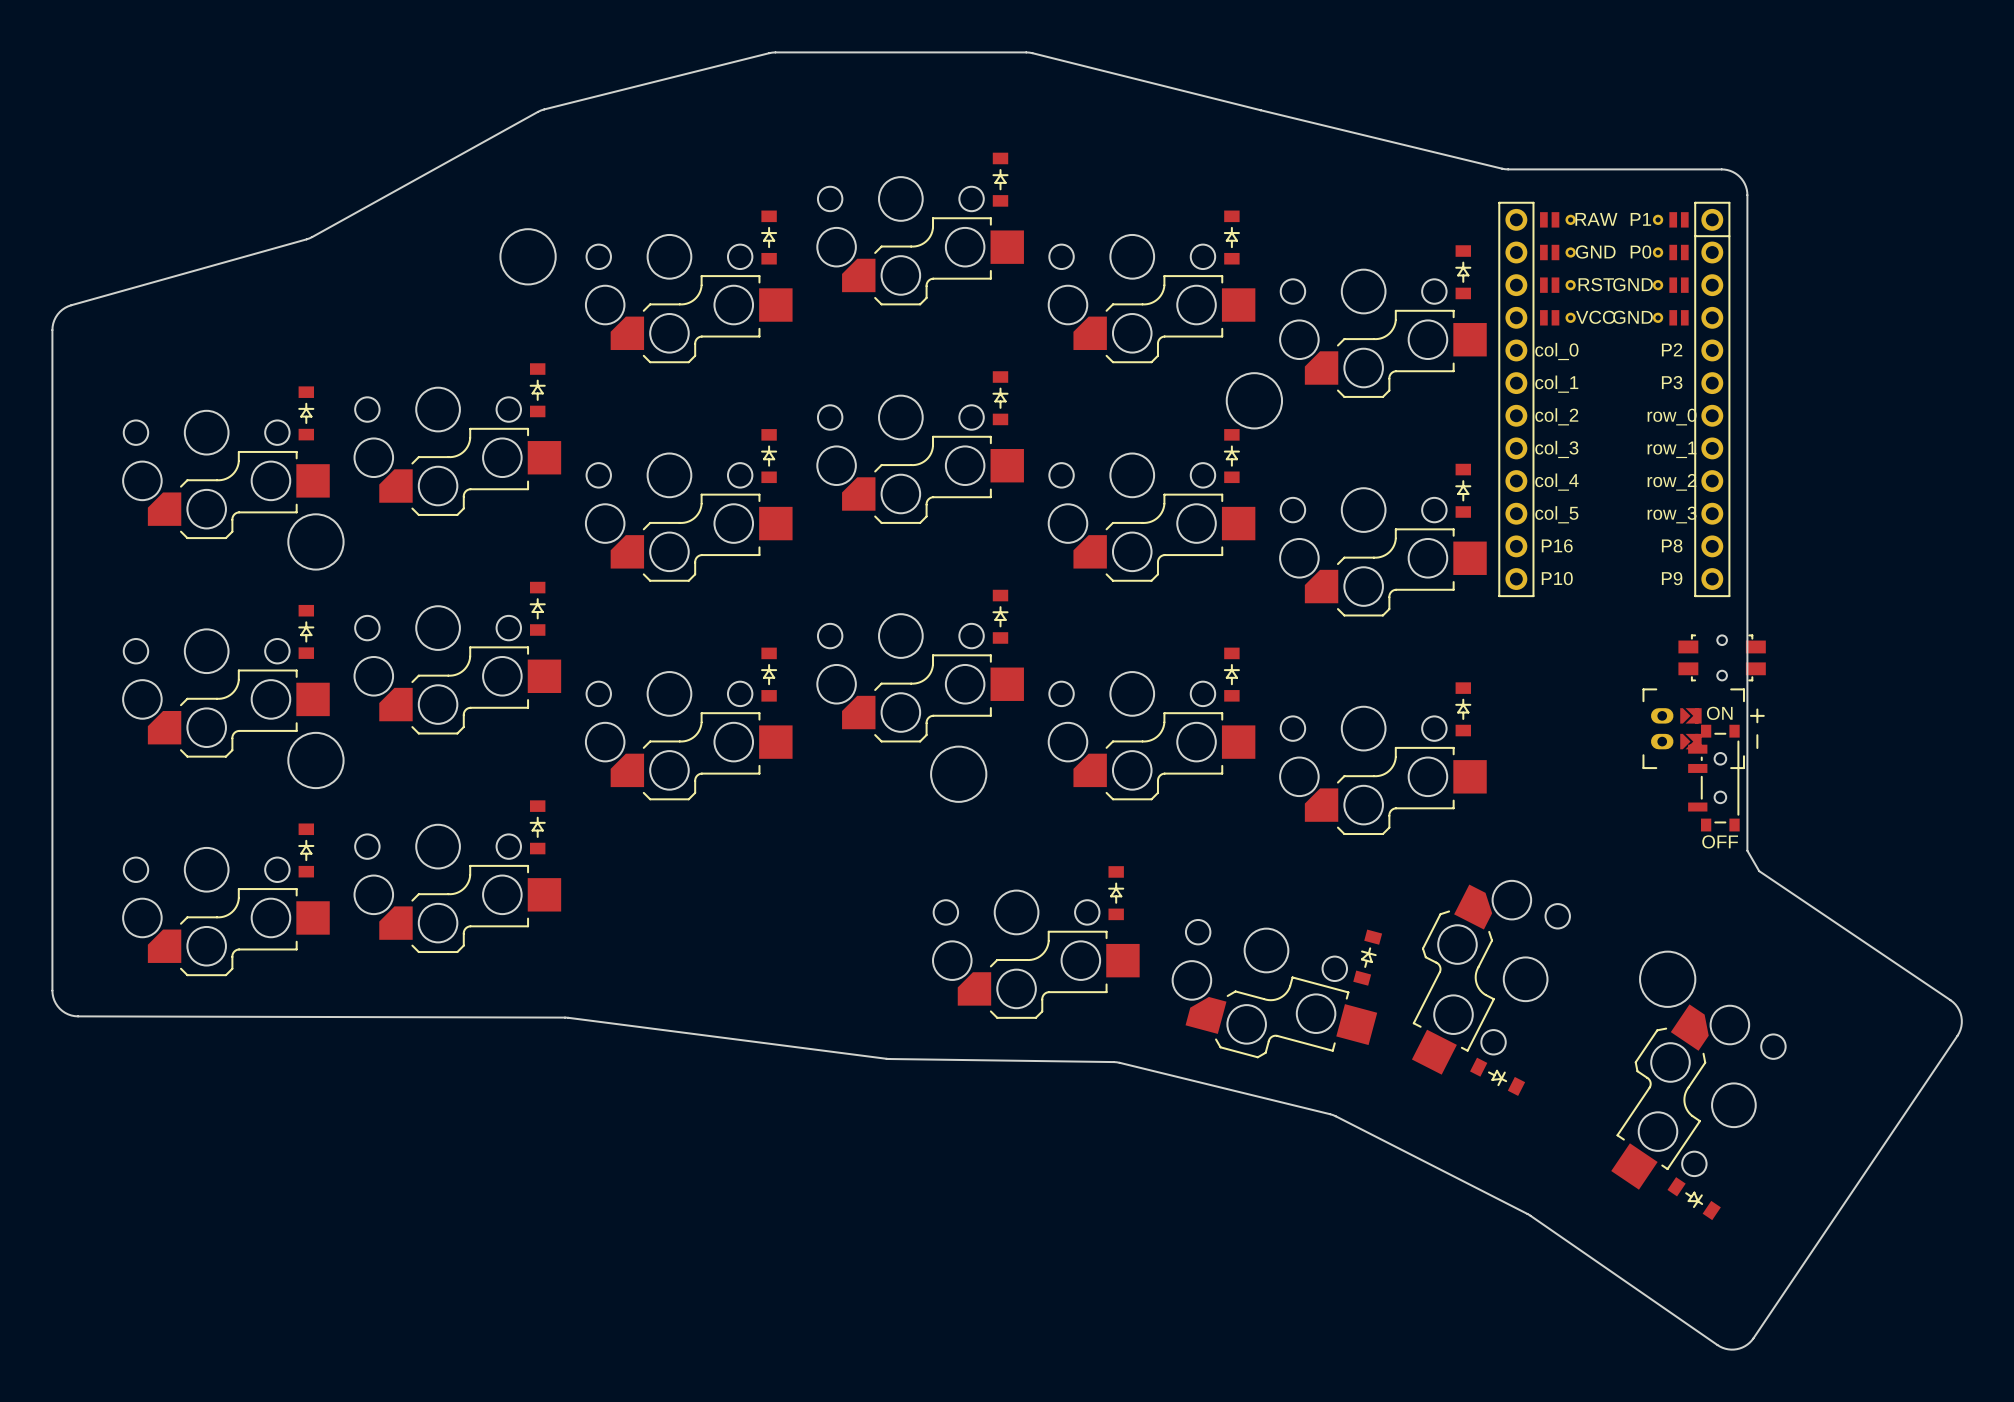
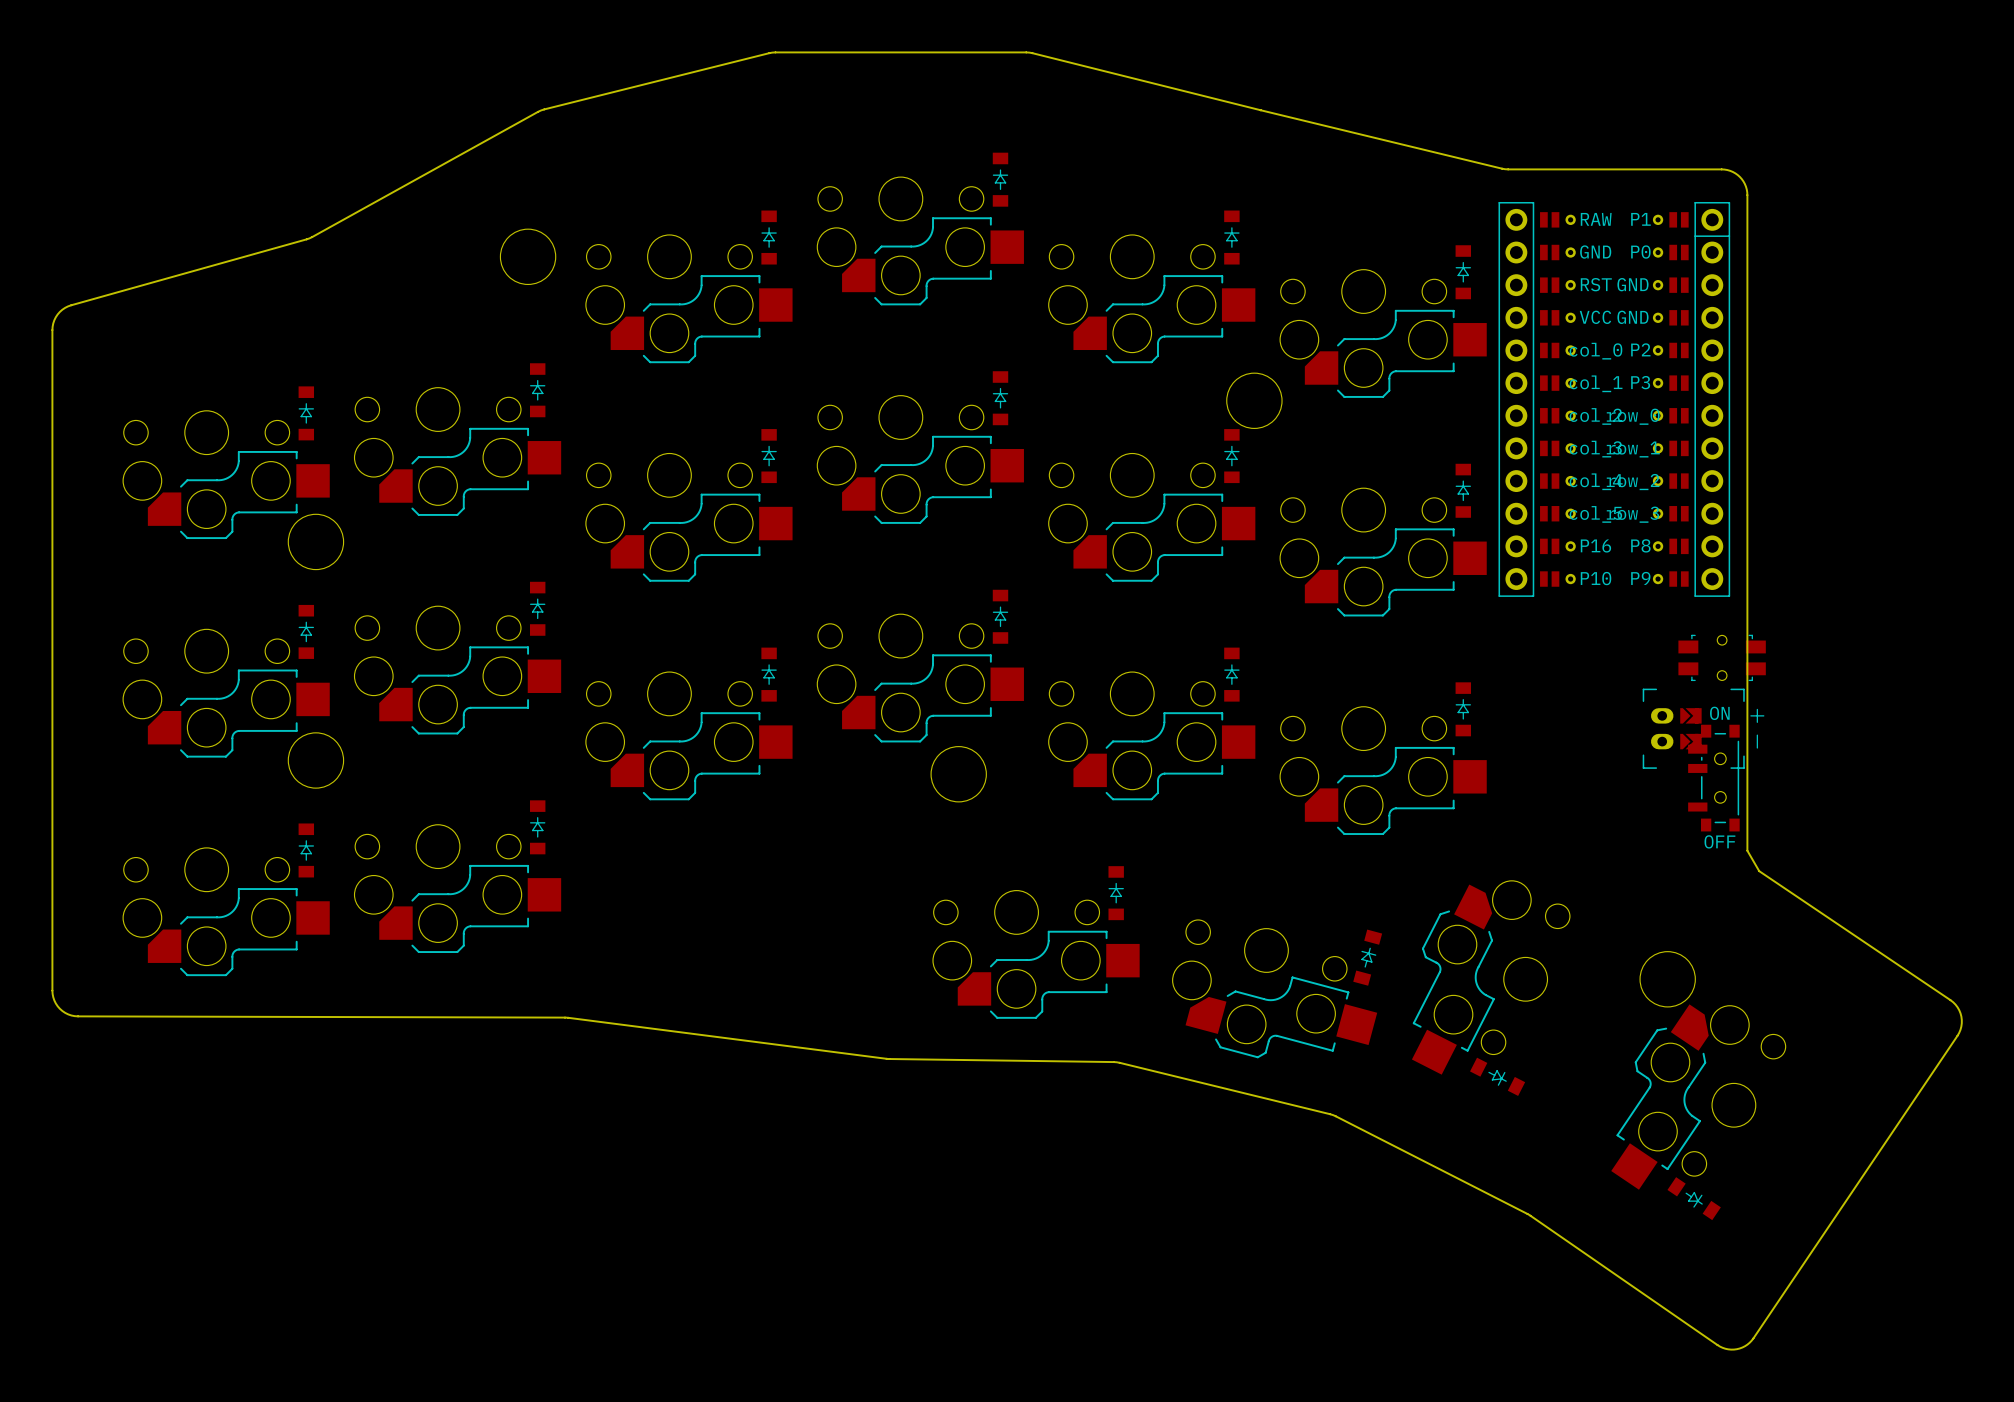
part footprint: [1498, 201, 1731, 597] -> [1498, 201, 1731, 597]

